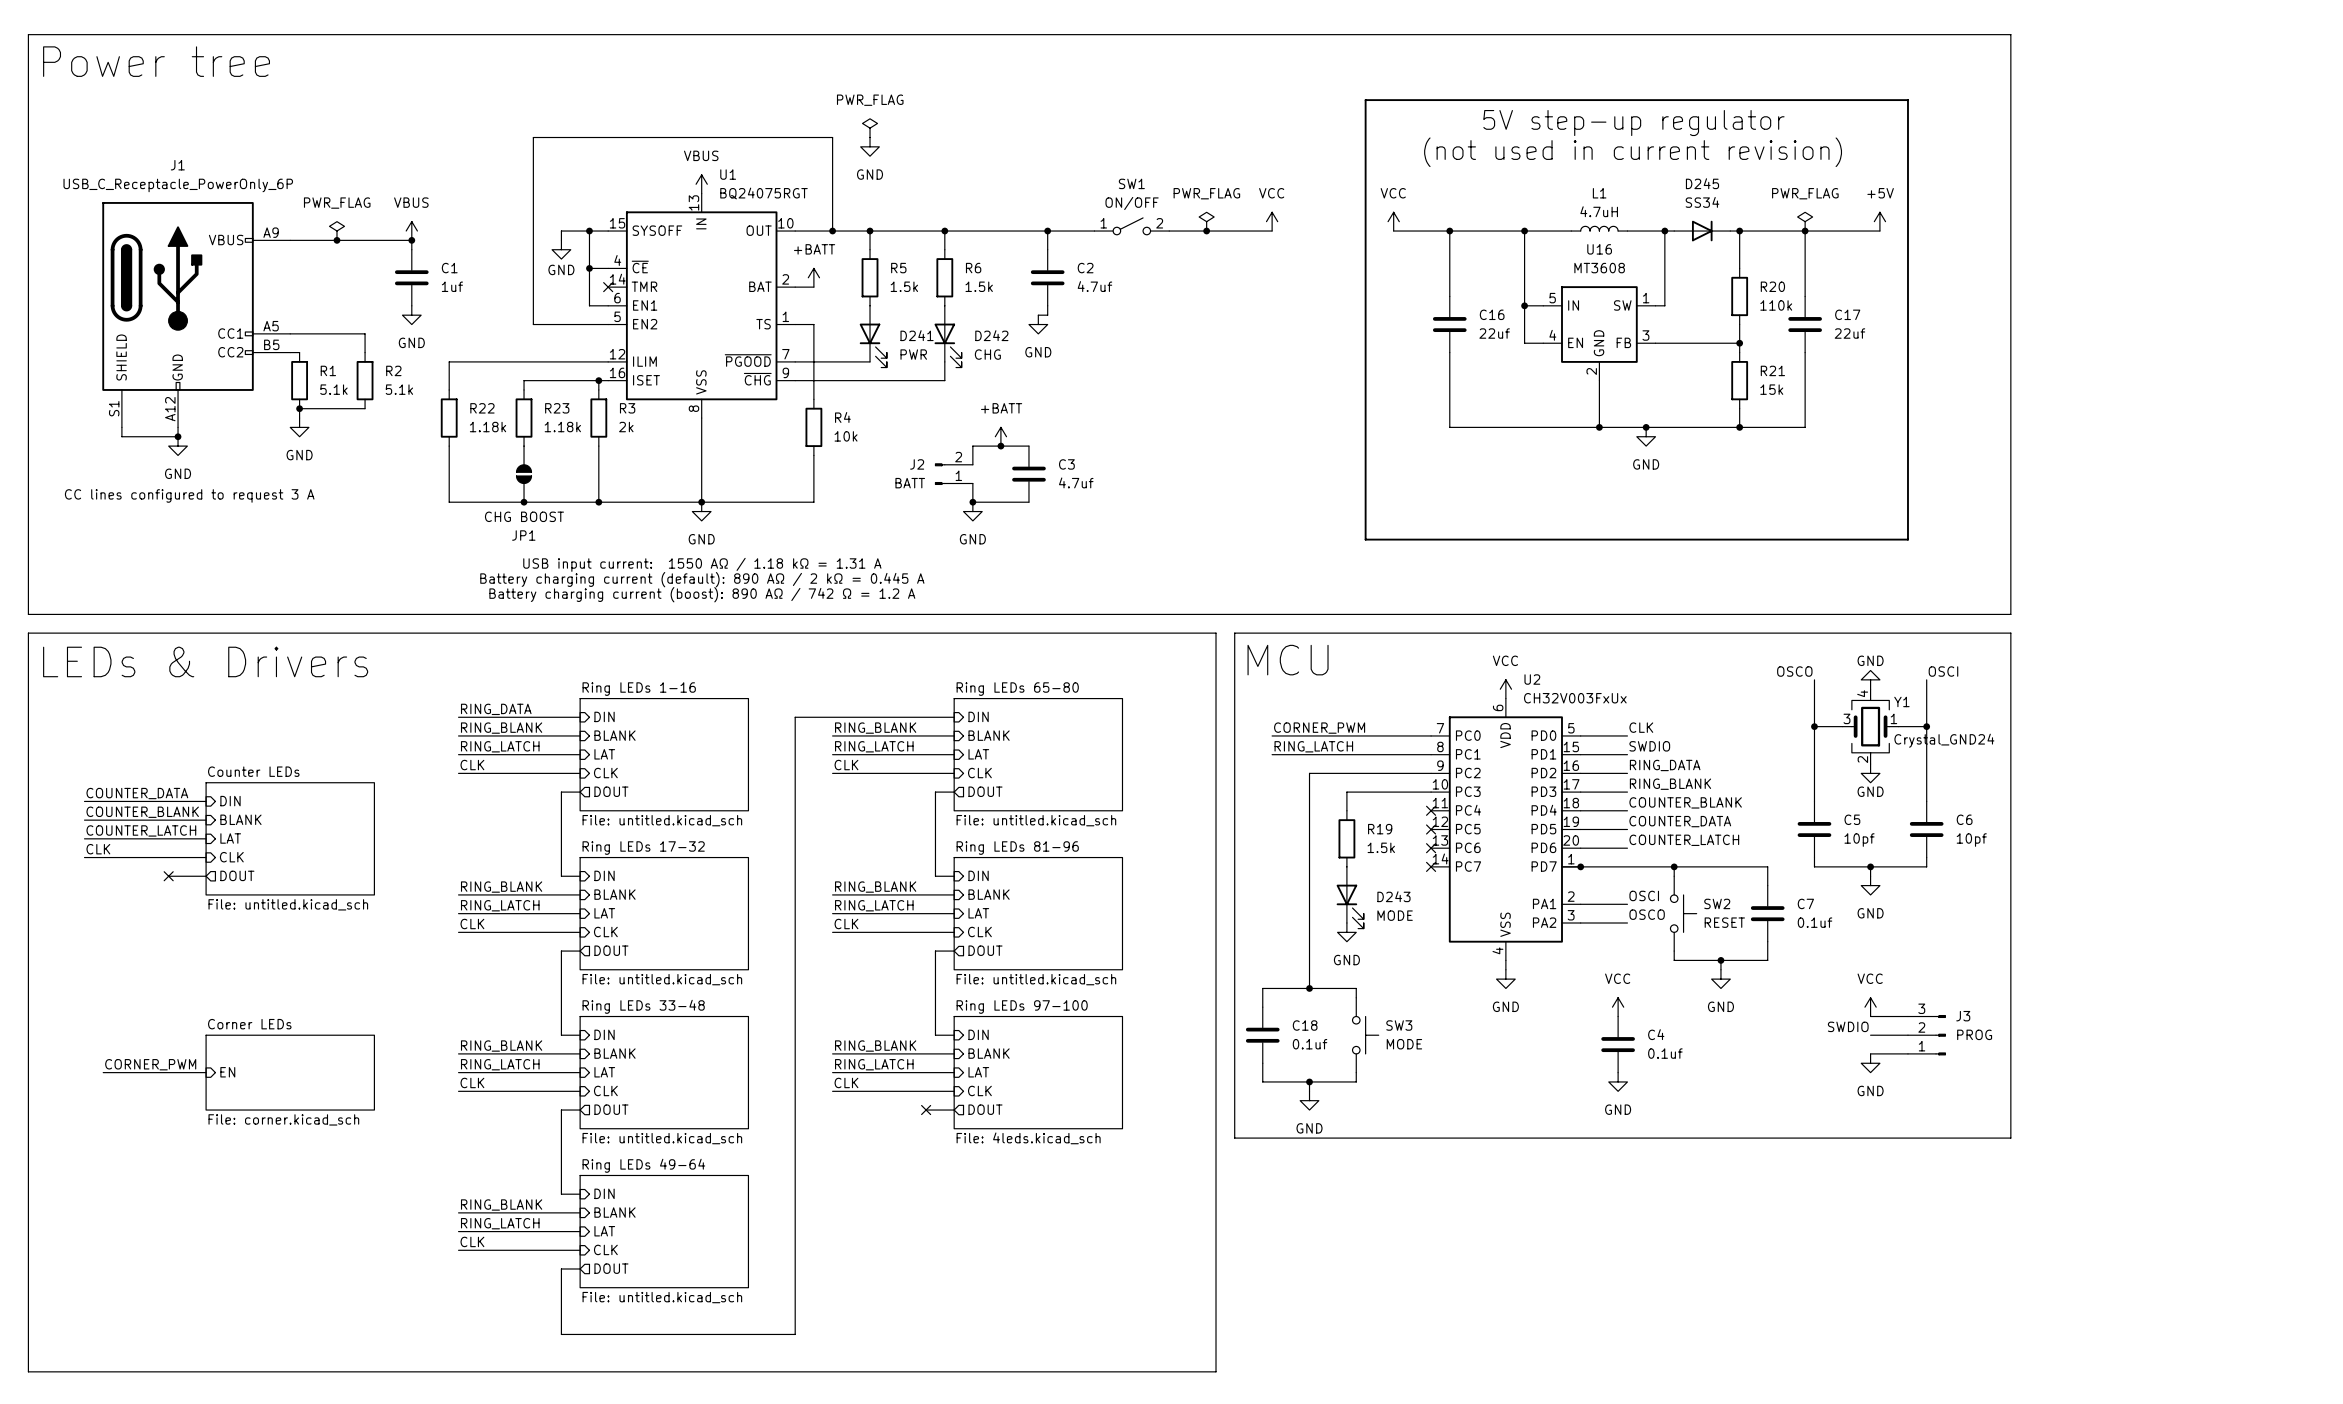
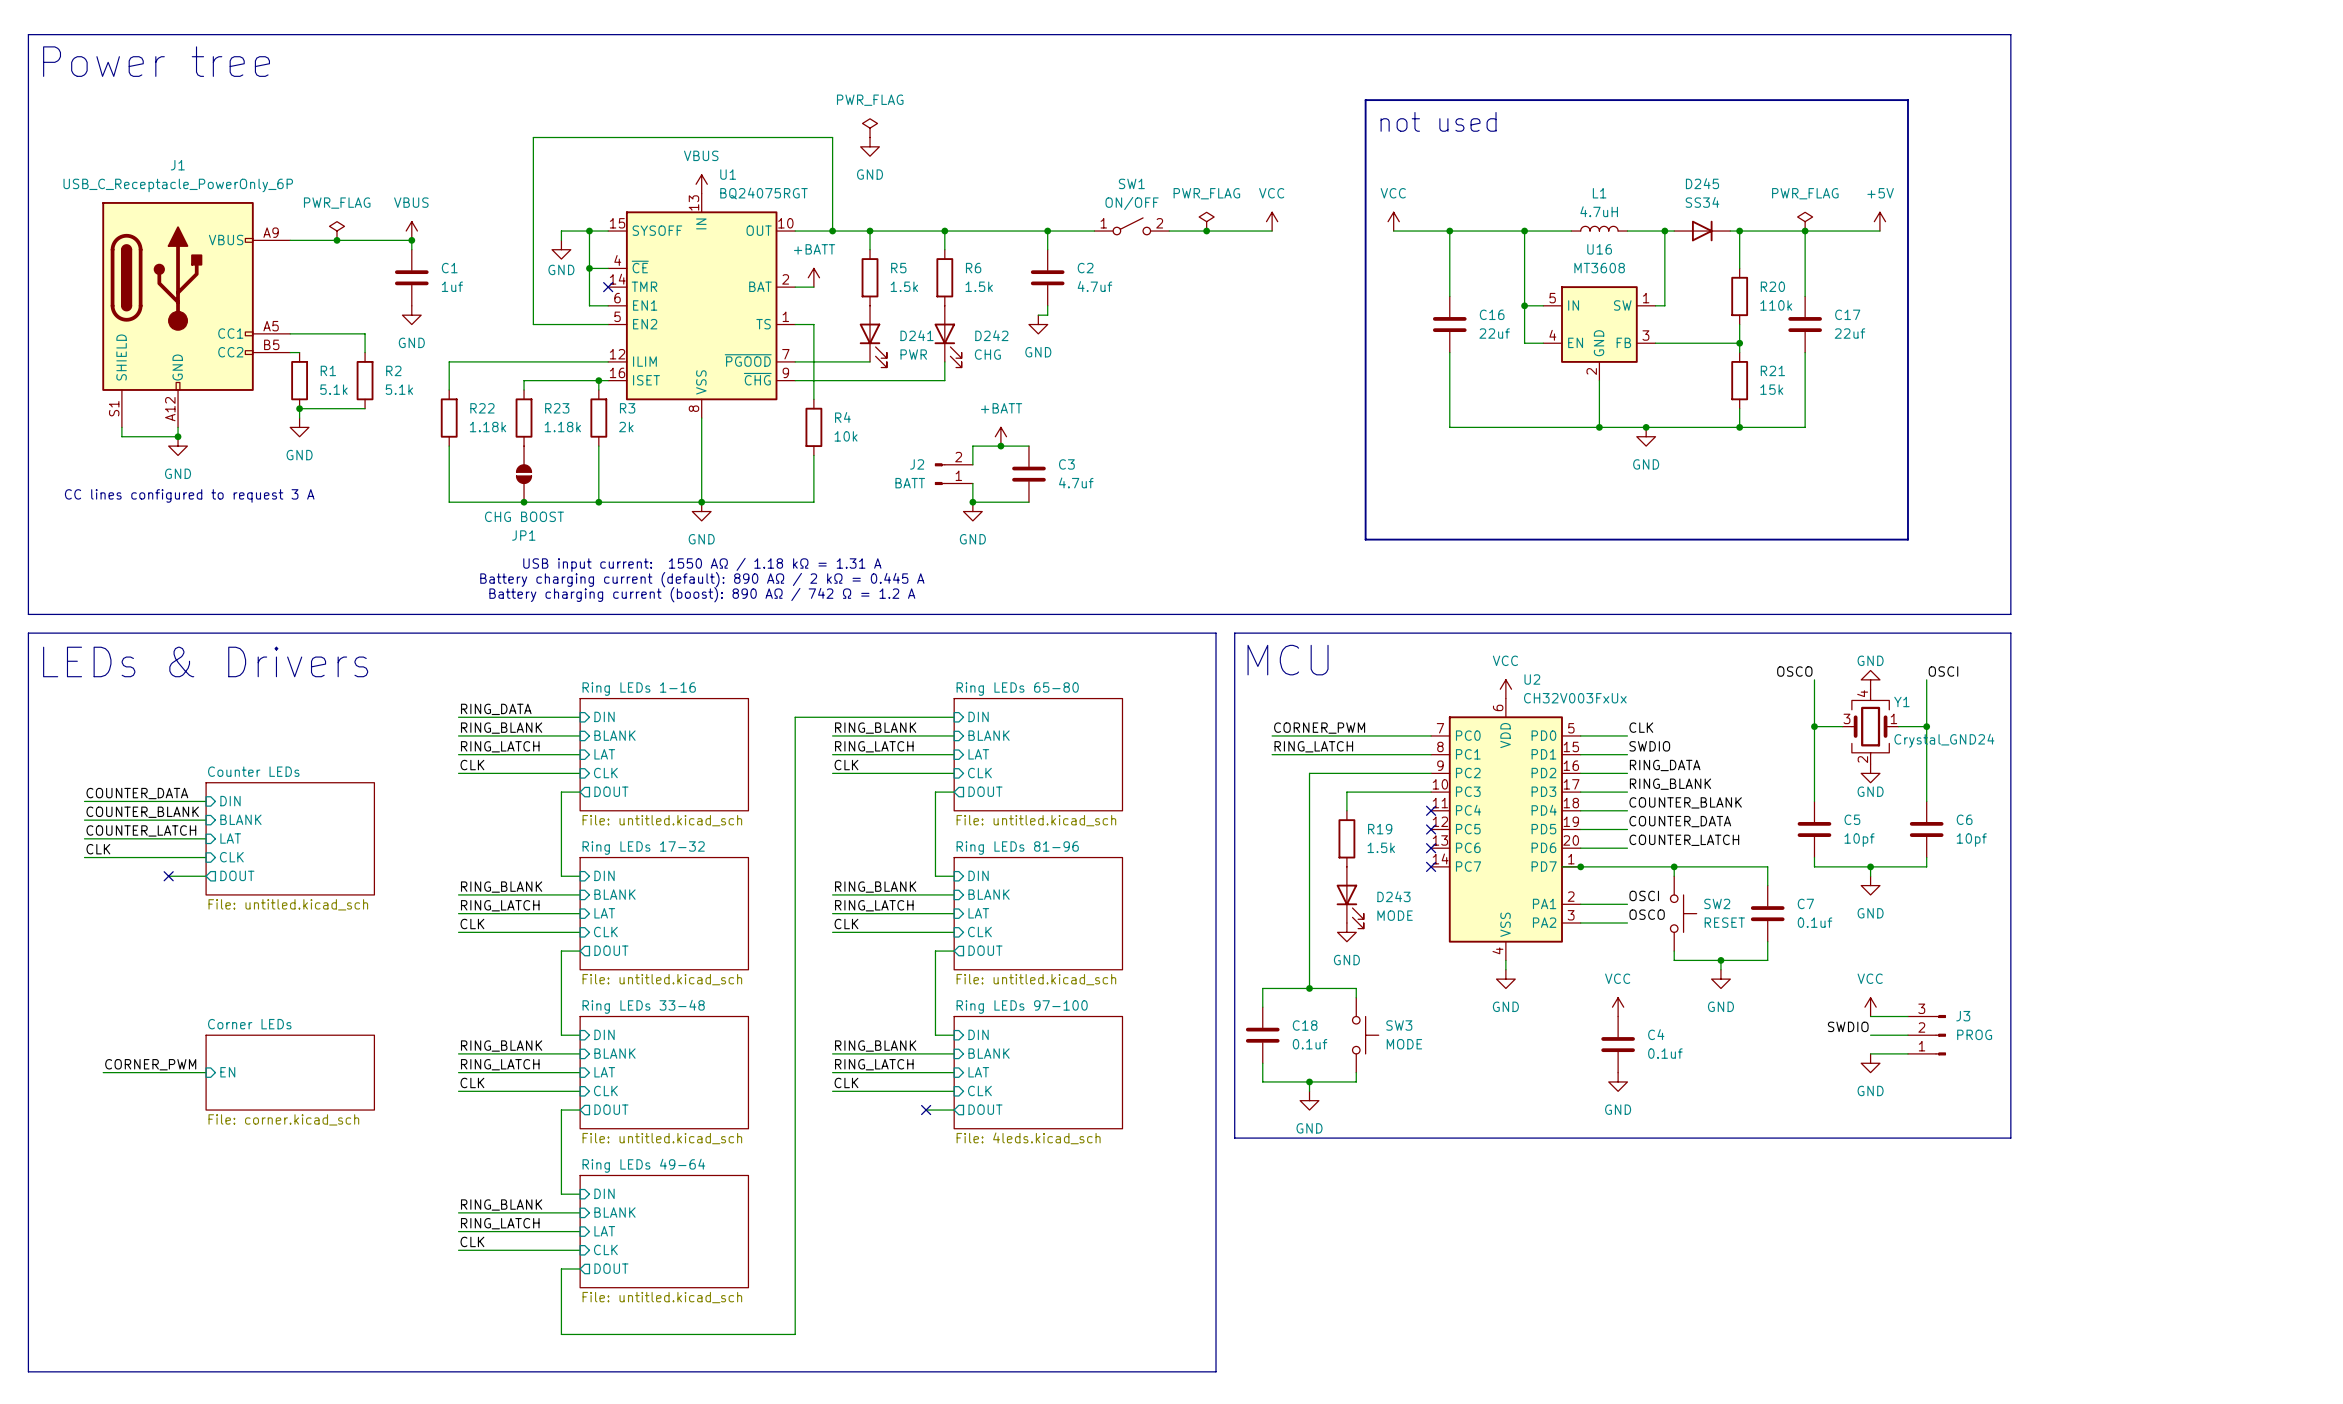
text: none -> not used (1438, 121)
text: 5V step-up regulator (1633, 123) -> none
text: (not used in current revision) (1633, 152) -> none

